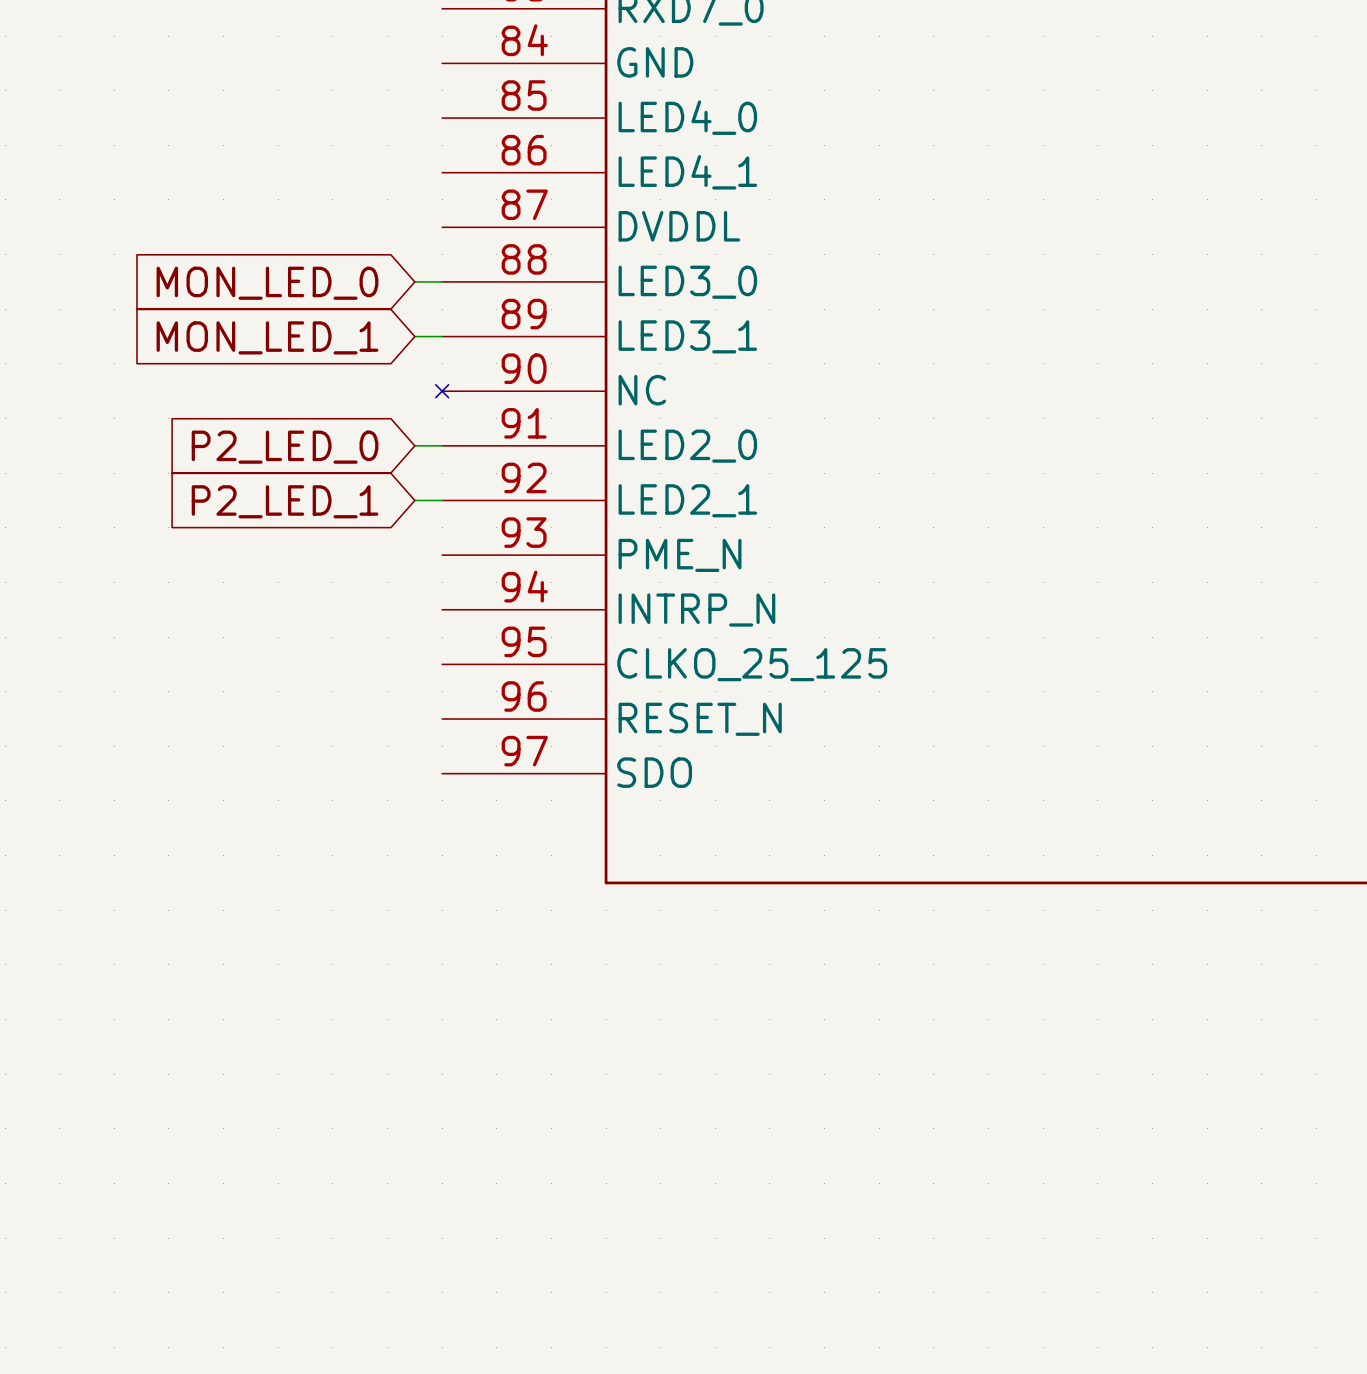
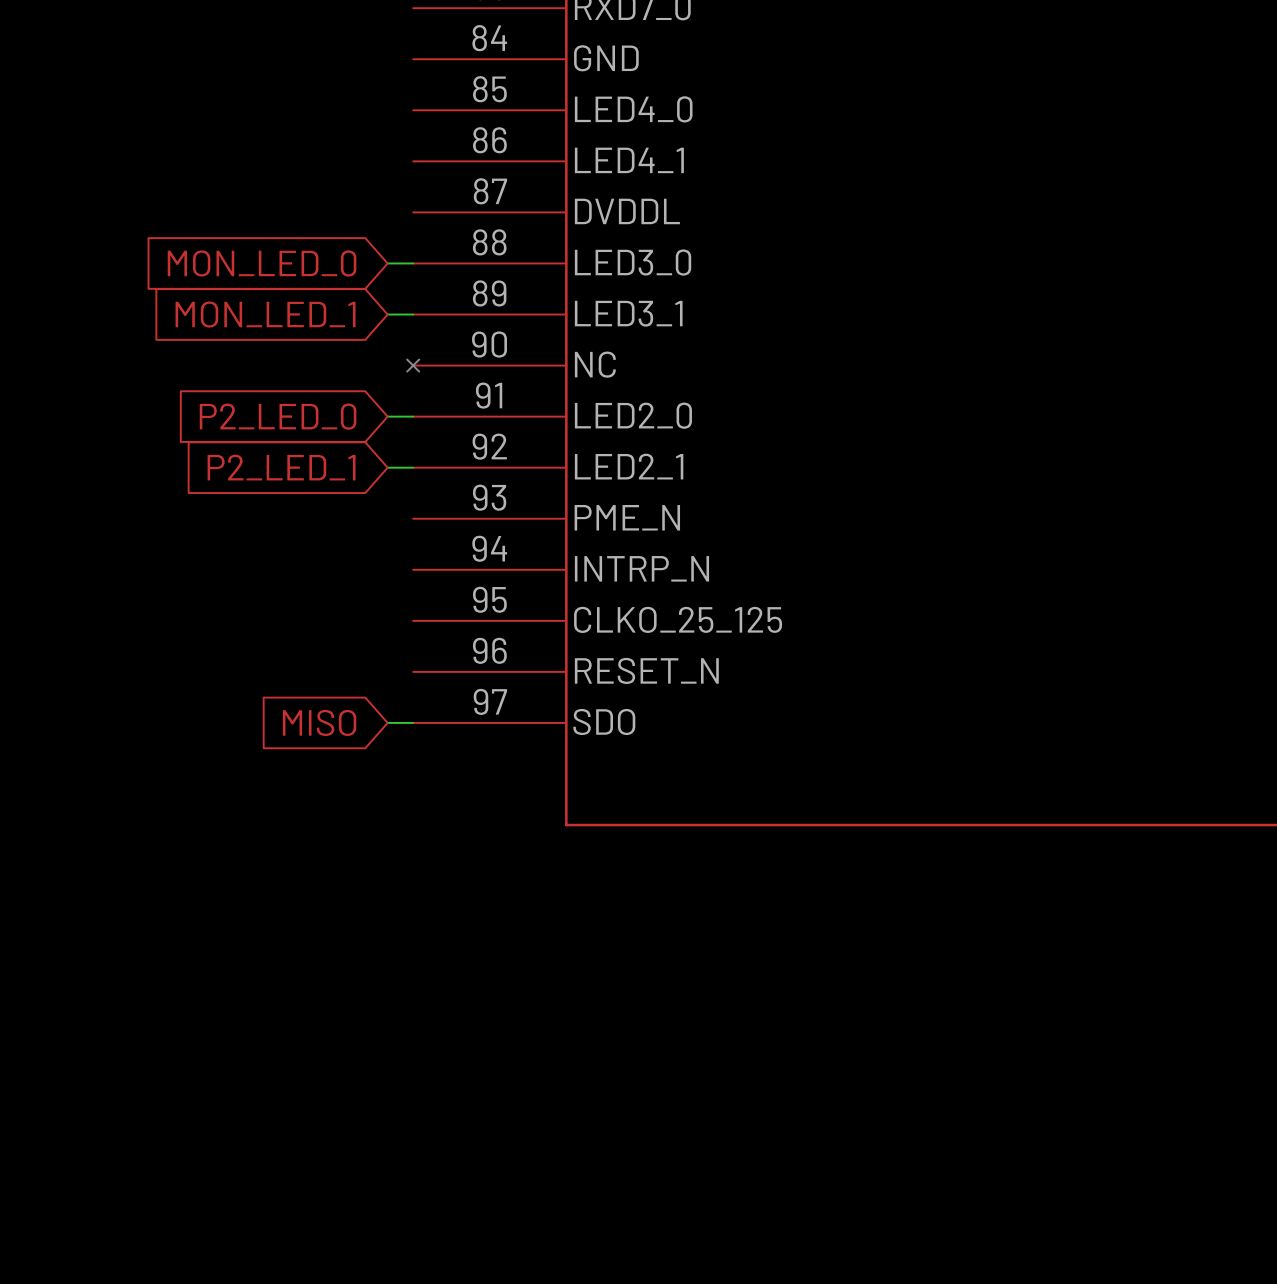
global label: none -> MISO (319, 722)
wire: none -> (387, 722) (413, 722)

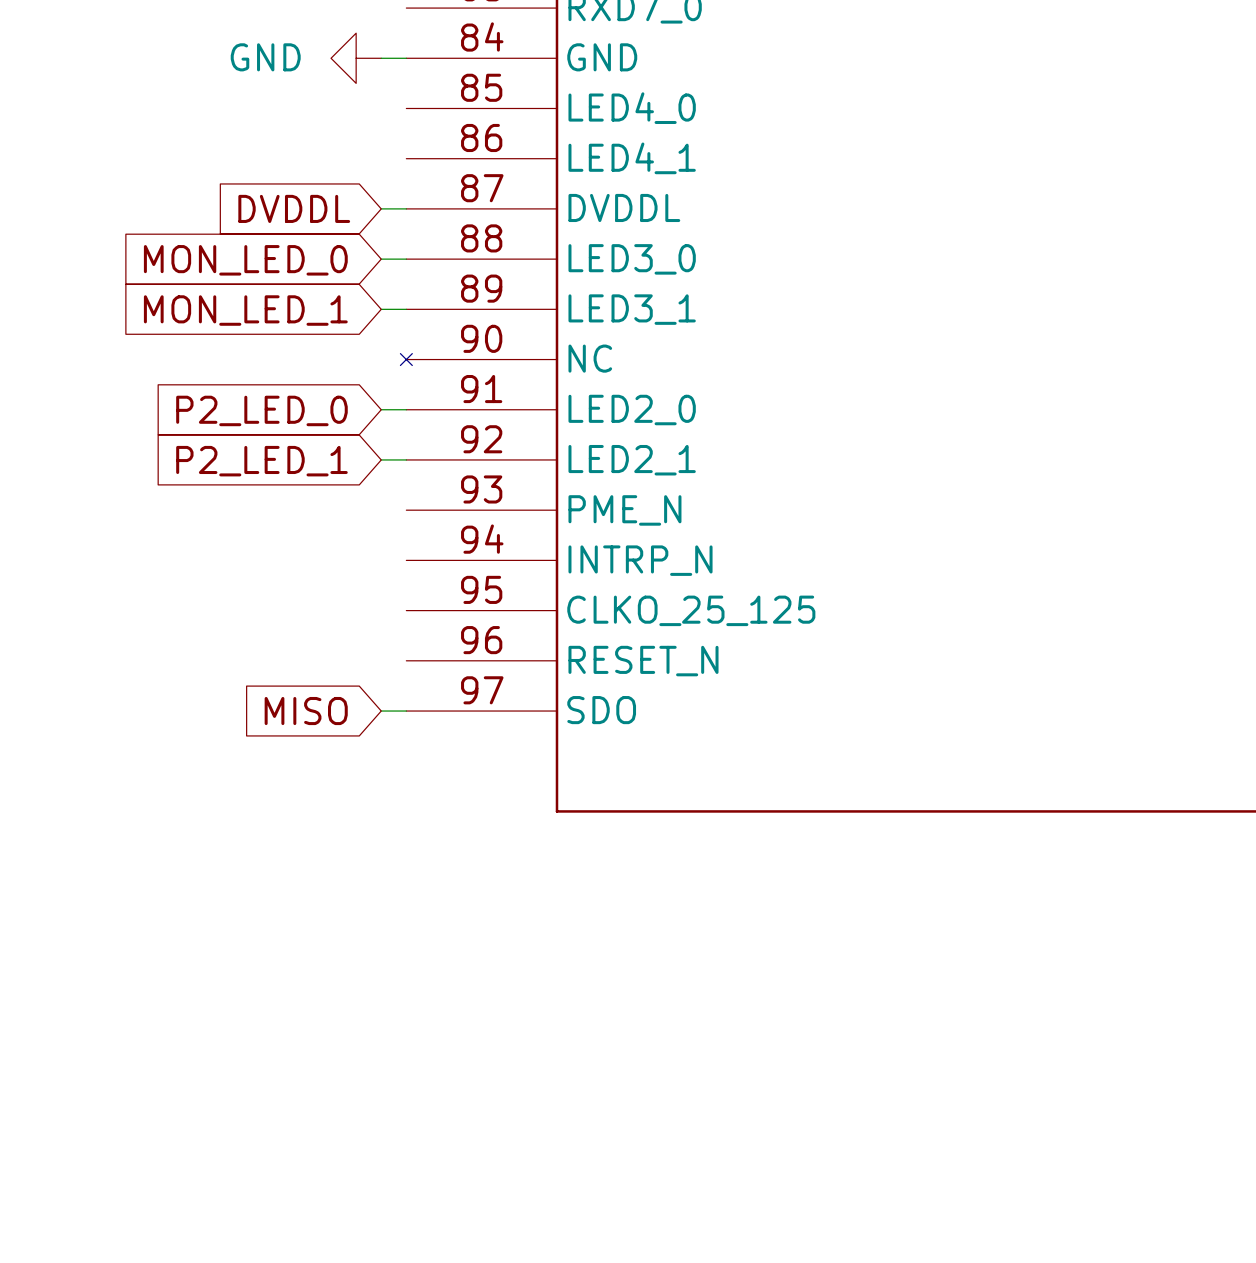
power symbol: none -> GND (356, 58)
wire: none -> (381, 58) (406, 58)
global label: none -> DVDDL (294, 208)
wire: none -> (381, 208) (406, 208)

